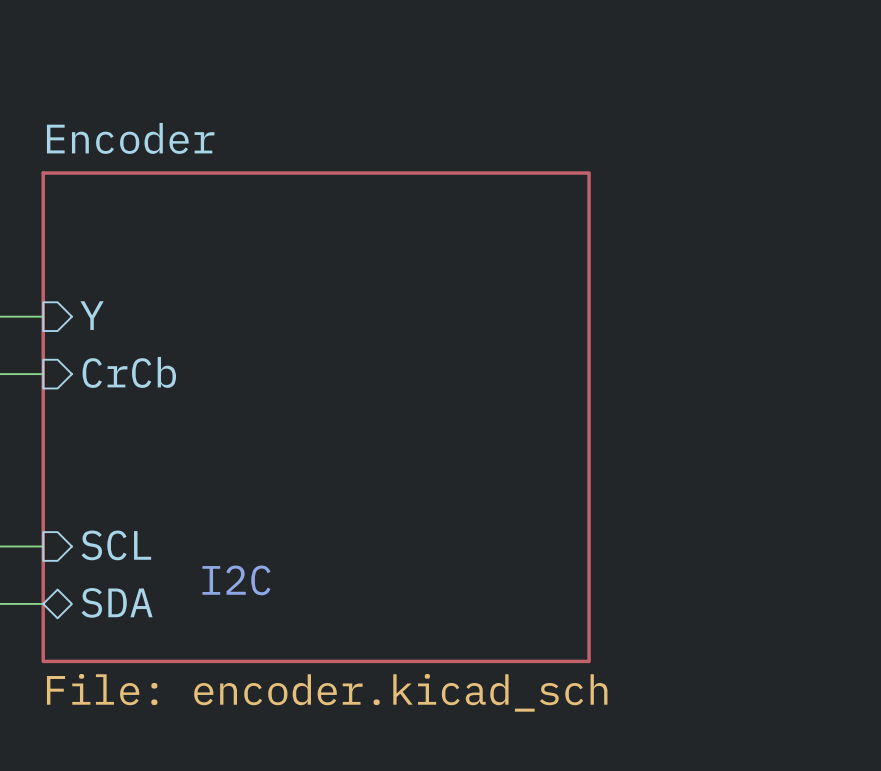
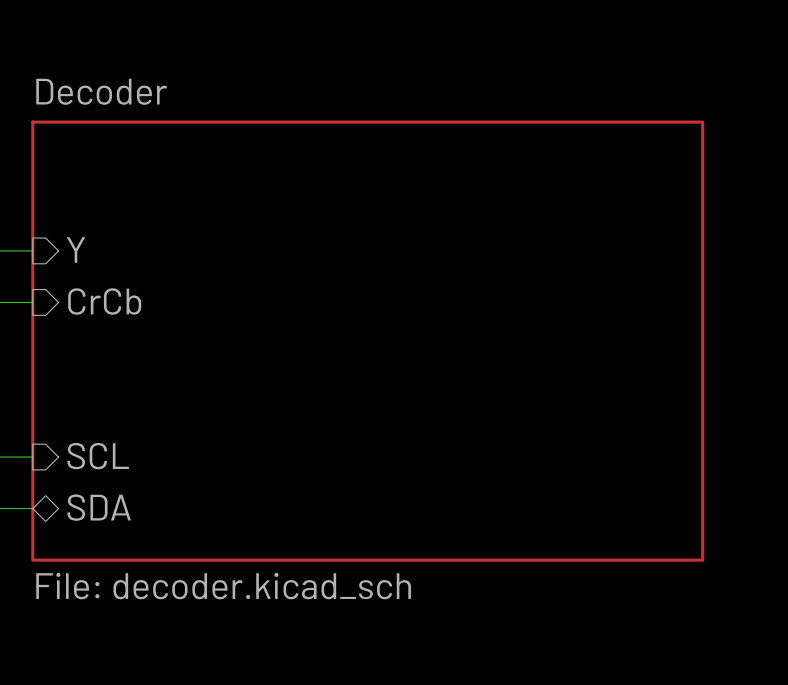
sheet Encoder: File: encoder.kicad_sch (316, 417) -> none
sheet Decoder: none -> File: decoder.kicad_sch (367, 341)
text: I2C (236, 580) -> none

